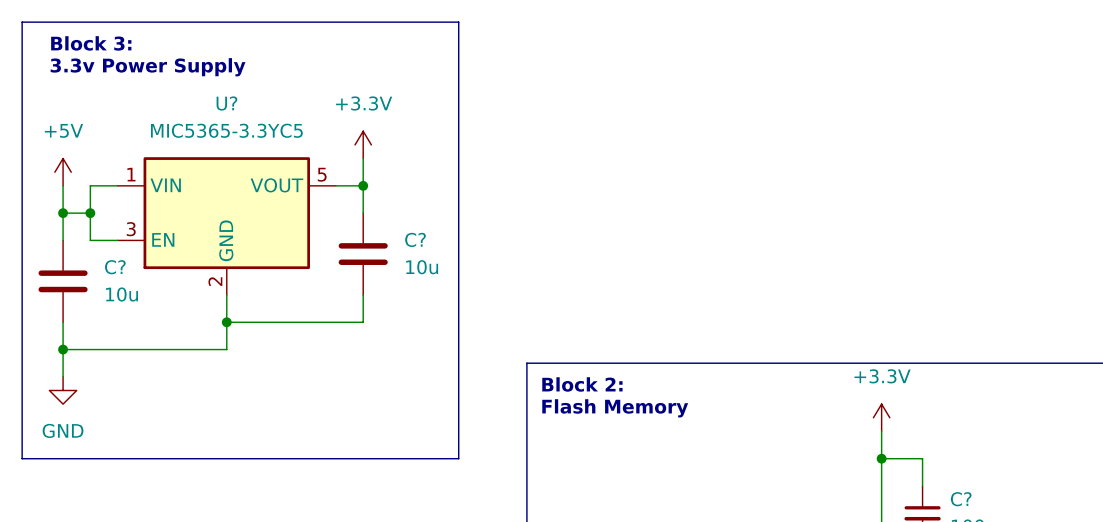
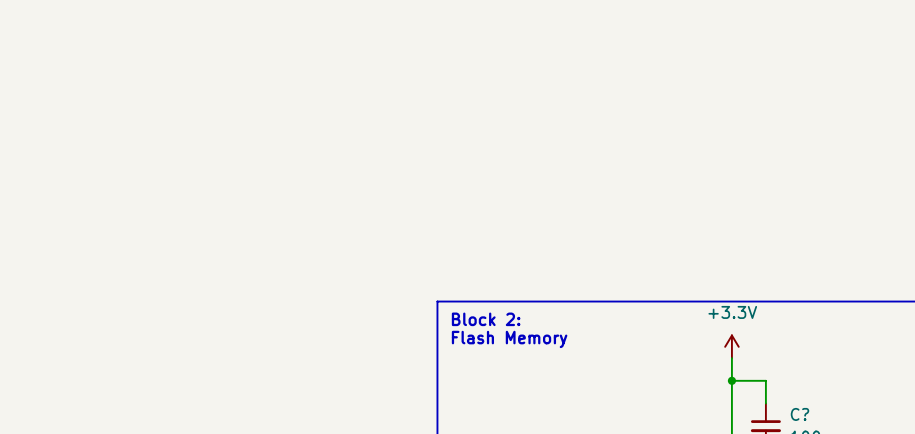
line: (22, 22) (22, 458) (458, 458) (458, 22) (22, 22) -> none
text: Block 3: (91, 43) -> none
text: 3.3v Power Supply (148, 67) -> none
power symbol: +3.3V (363, 144) -> none
wire: (363, 158) (363, 213) -> none
power symbol: +5V (63, 172) -> none
wire: (63, 185) (63, 240) -> none
wire: (117, 185) (90, 185) (90, 240) (117, 240) -> none
wire: (335, 185) (363, 185) -> none
junction: (363, 185) -> none
wire: (63, 213) (90, 213) -> none
junction: (63, 213) -> none
junction: (90, 213) -> none
U?: MIC5365-3.3YC5 (226, 226) -> none
C?: 10u (363, 254) -> none
C?: 10u (63, 281) -> none
wire: (226, 294) (226, 349) (63, 349) -> none
wire: (363, 294) (363, 322) (226, 322) -> none
wire: (63, 322) (63, 376) -> none
junction: (226, 322) -> none
junction: (63, 349) -> none
power symbol: GND (63, 390) -> none

